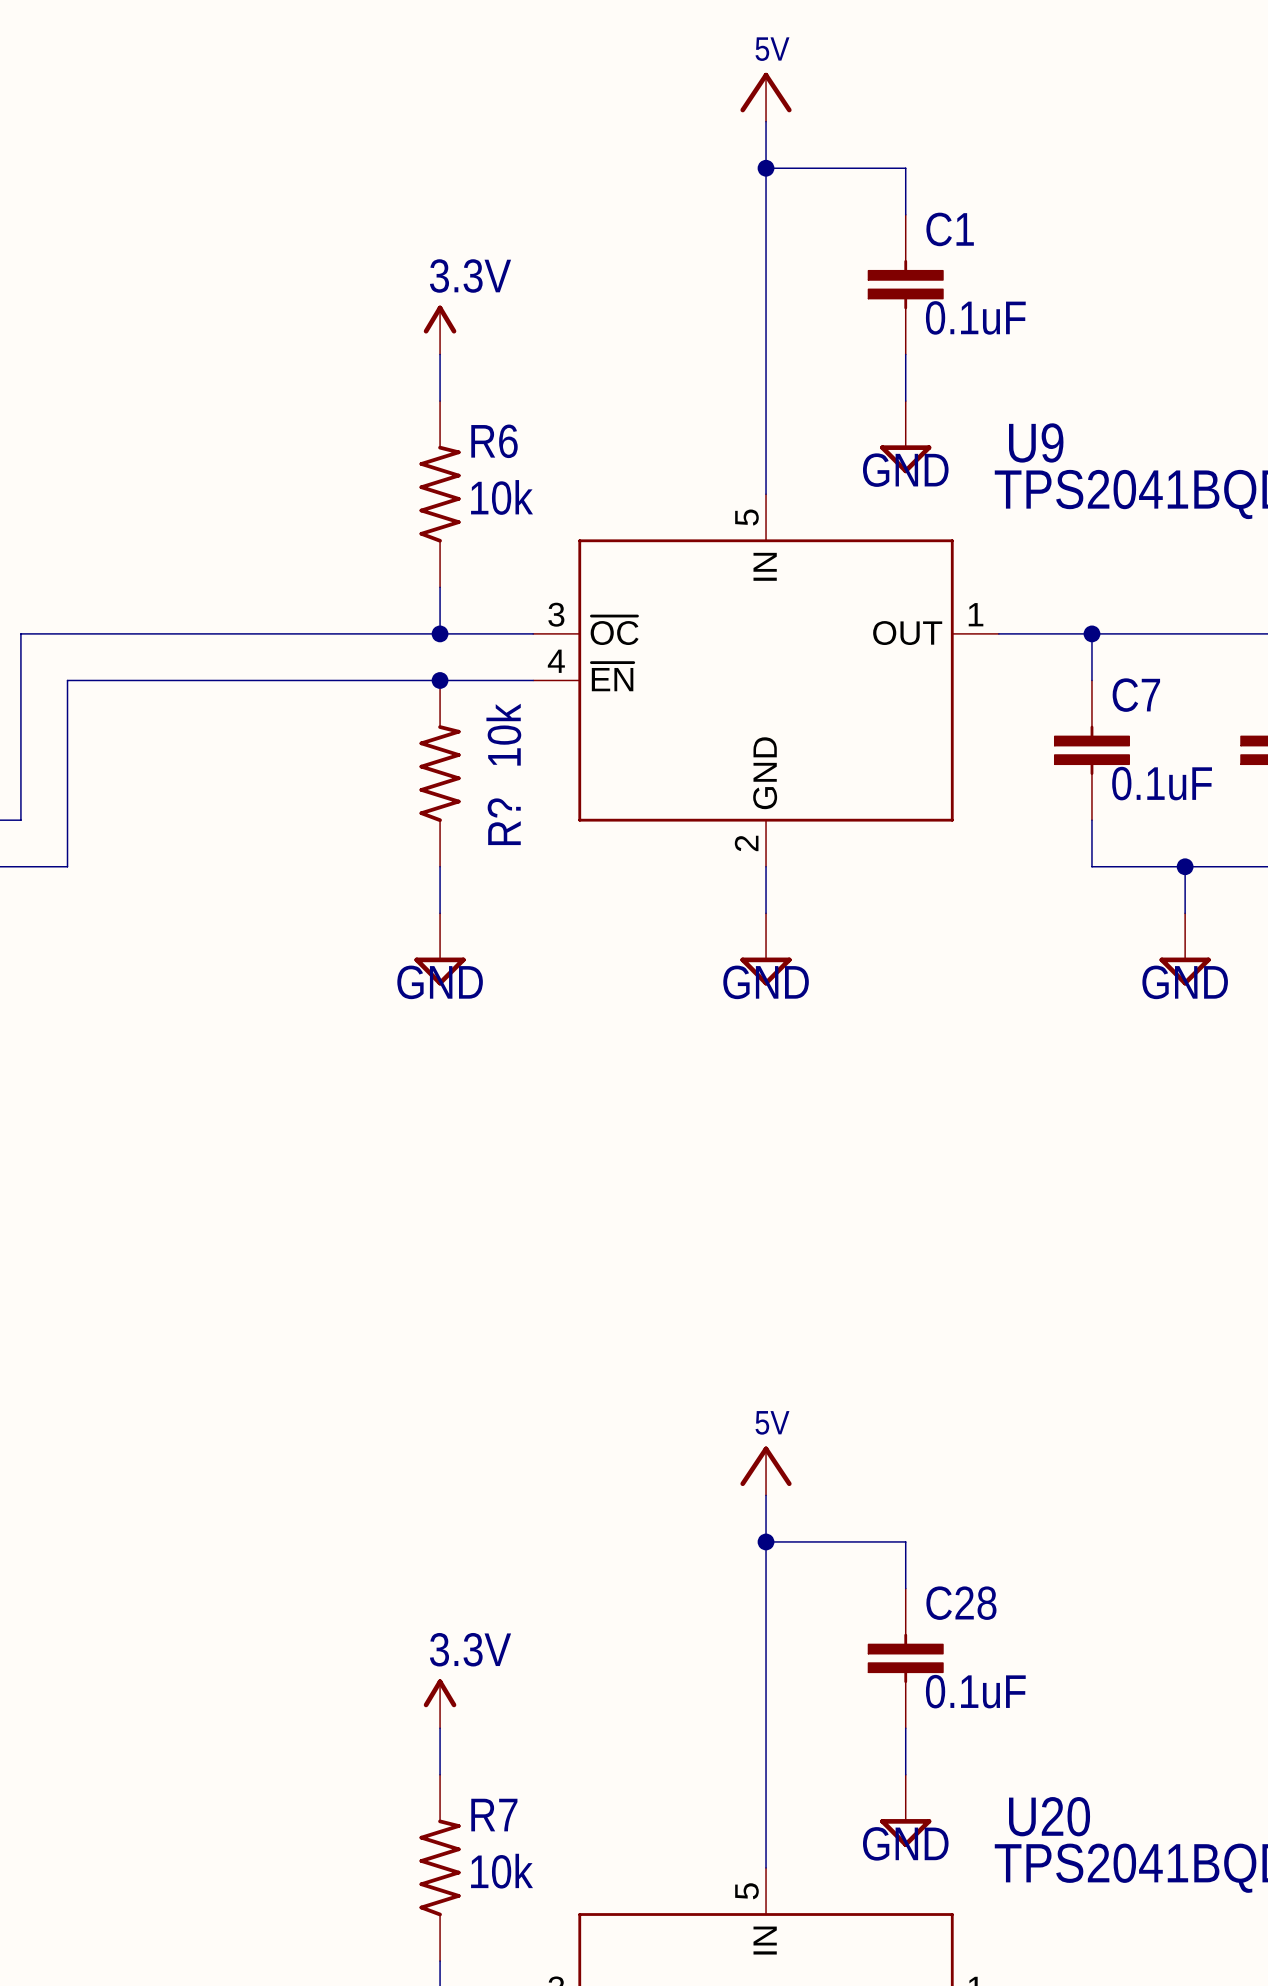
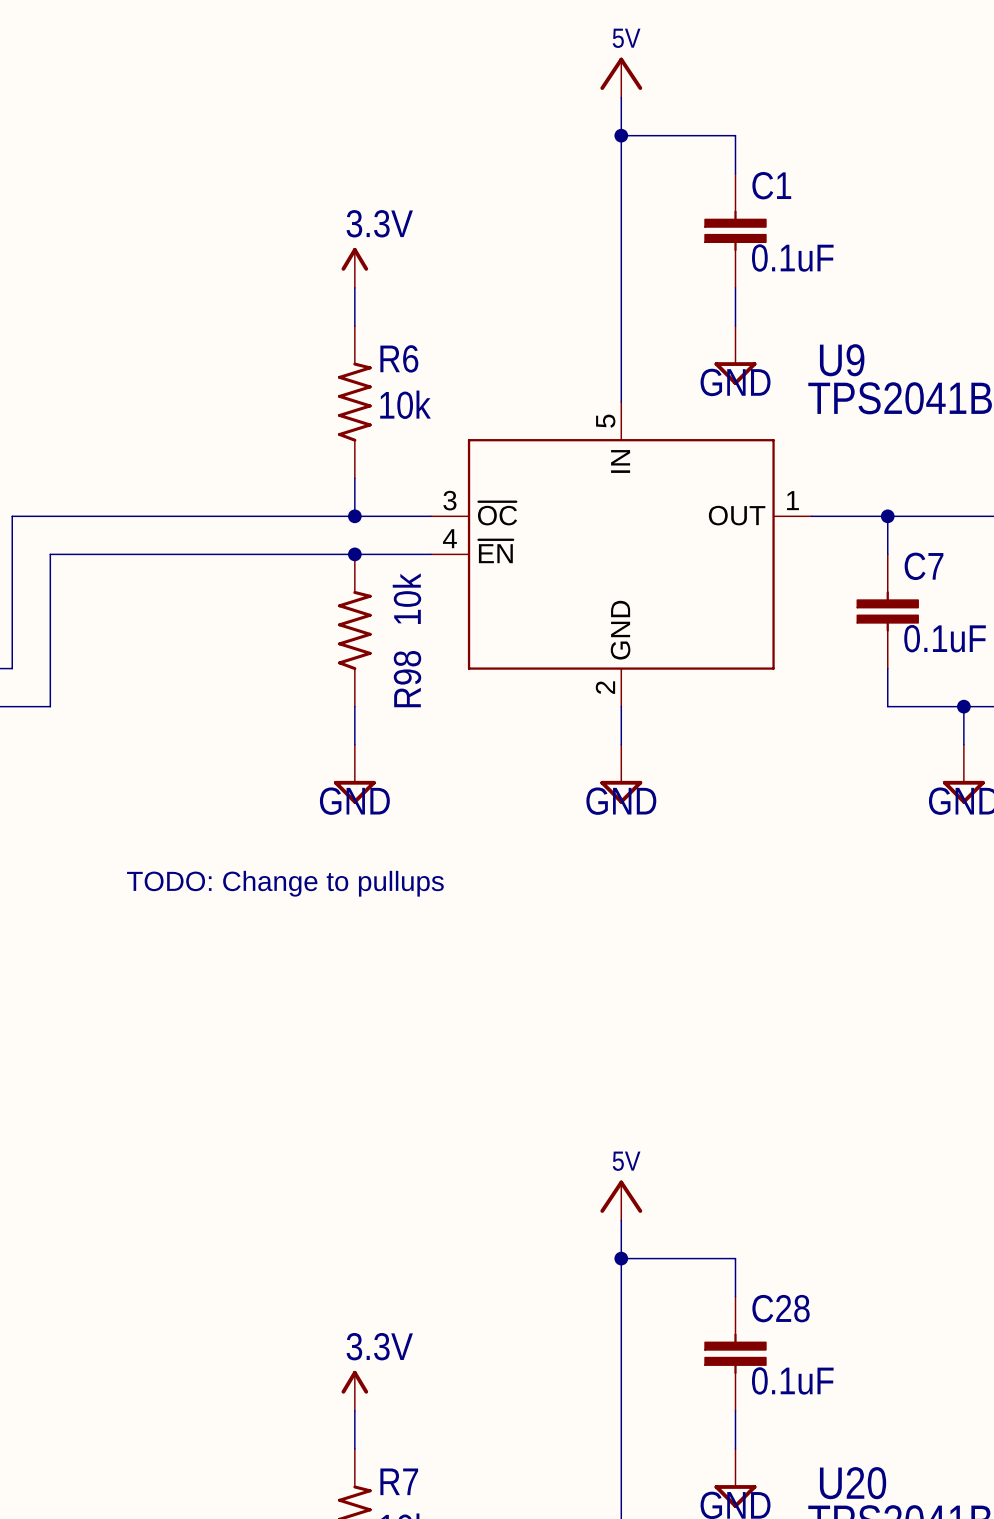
R? name: R? (504, 821) -> R98 (407, 679)
text: none -> TODO: Change to pullups (285, 883)

